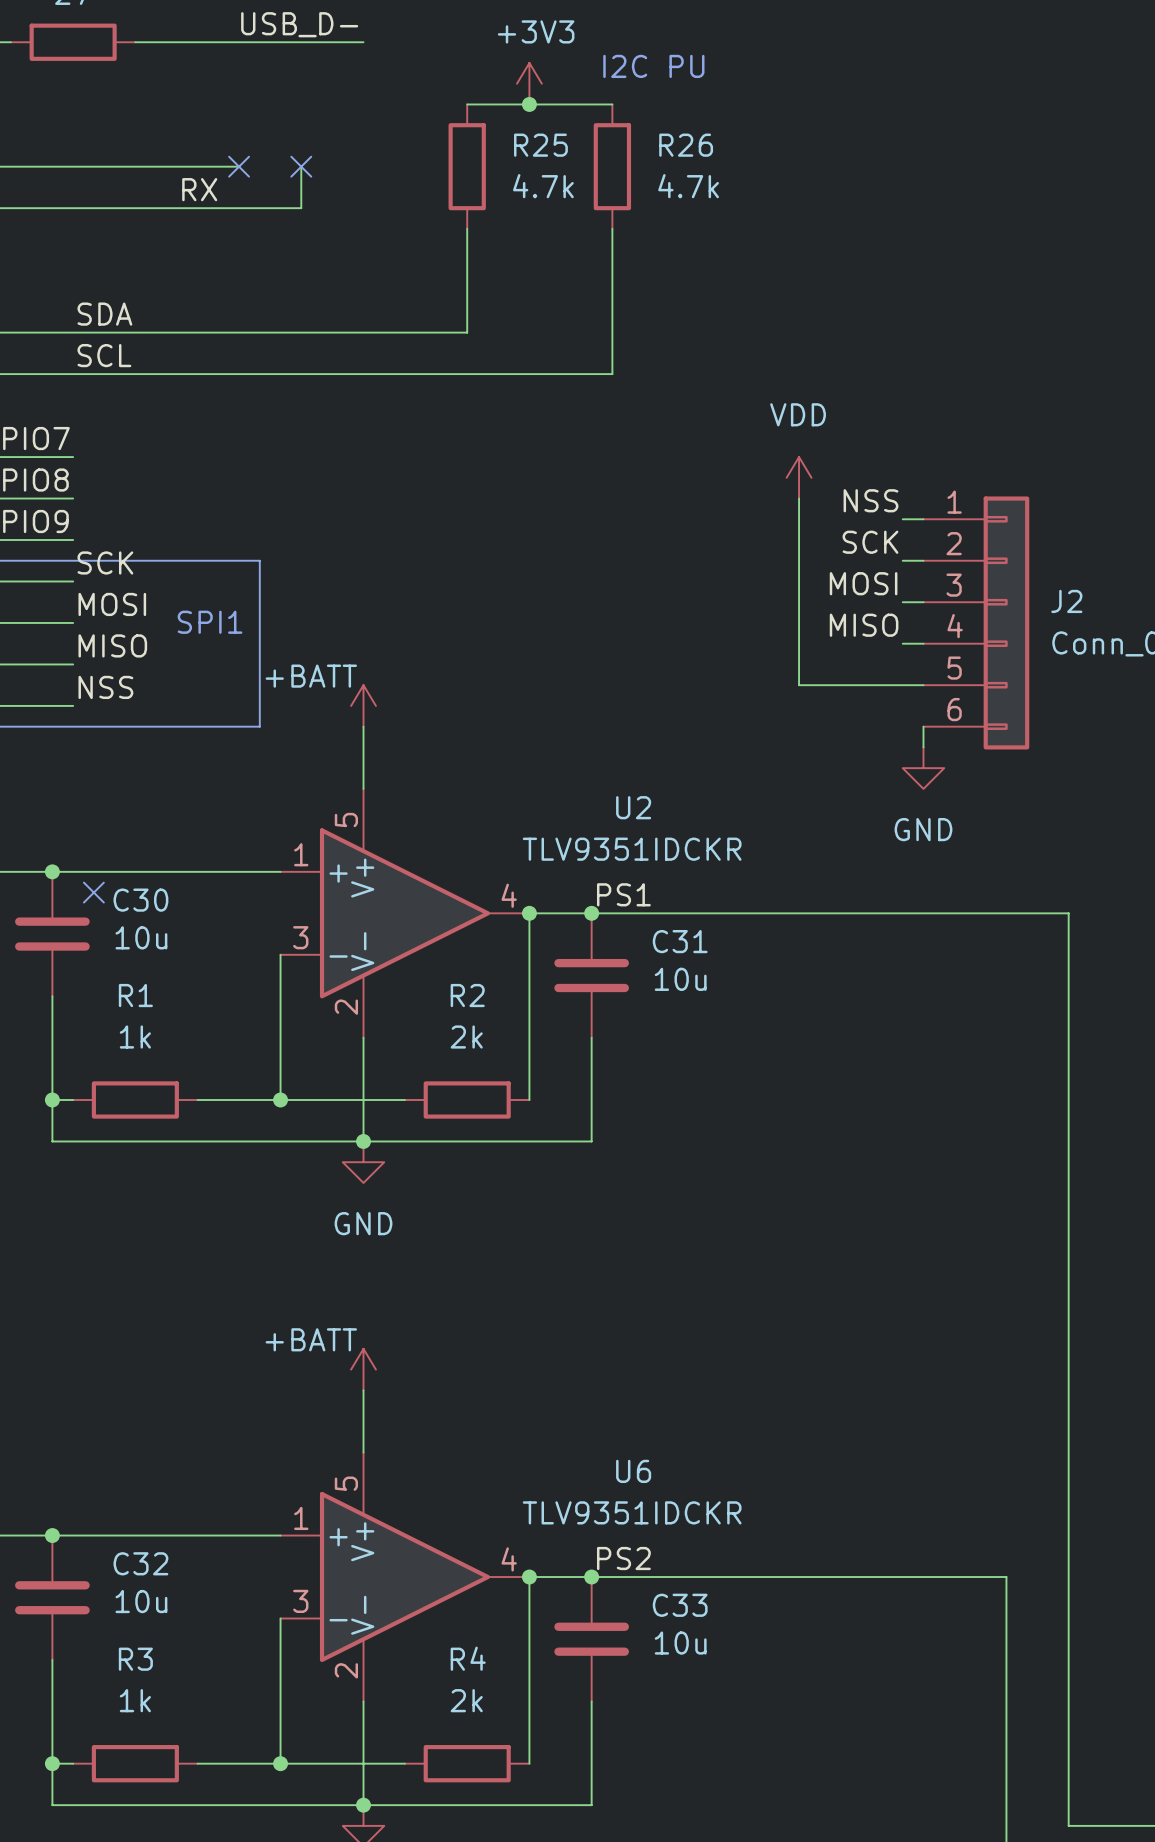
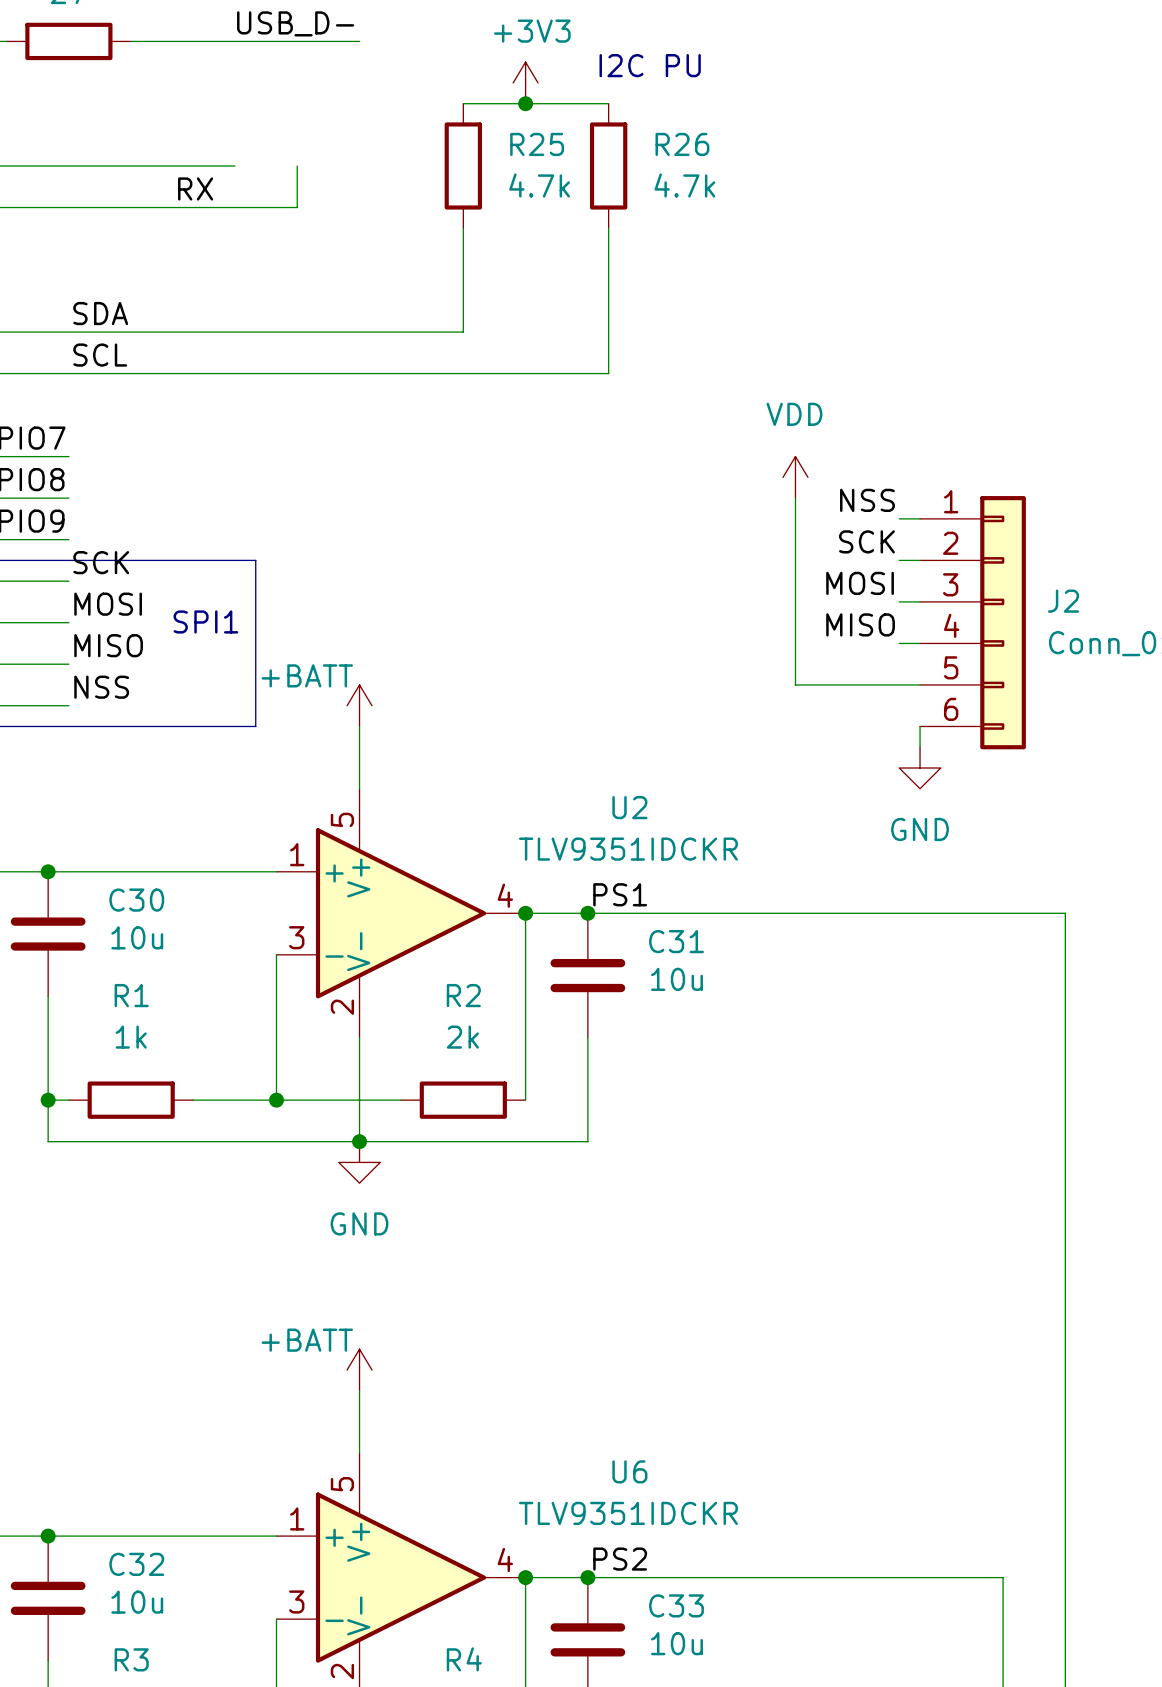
no-connect mark: (239, 166) -> none
no-connect mark: (301, 166) -> none
no-connect mark: (93, 892) -> none

